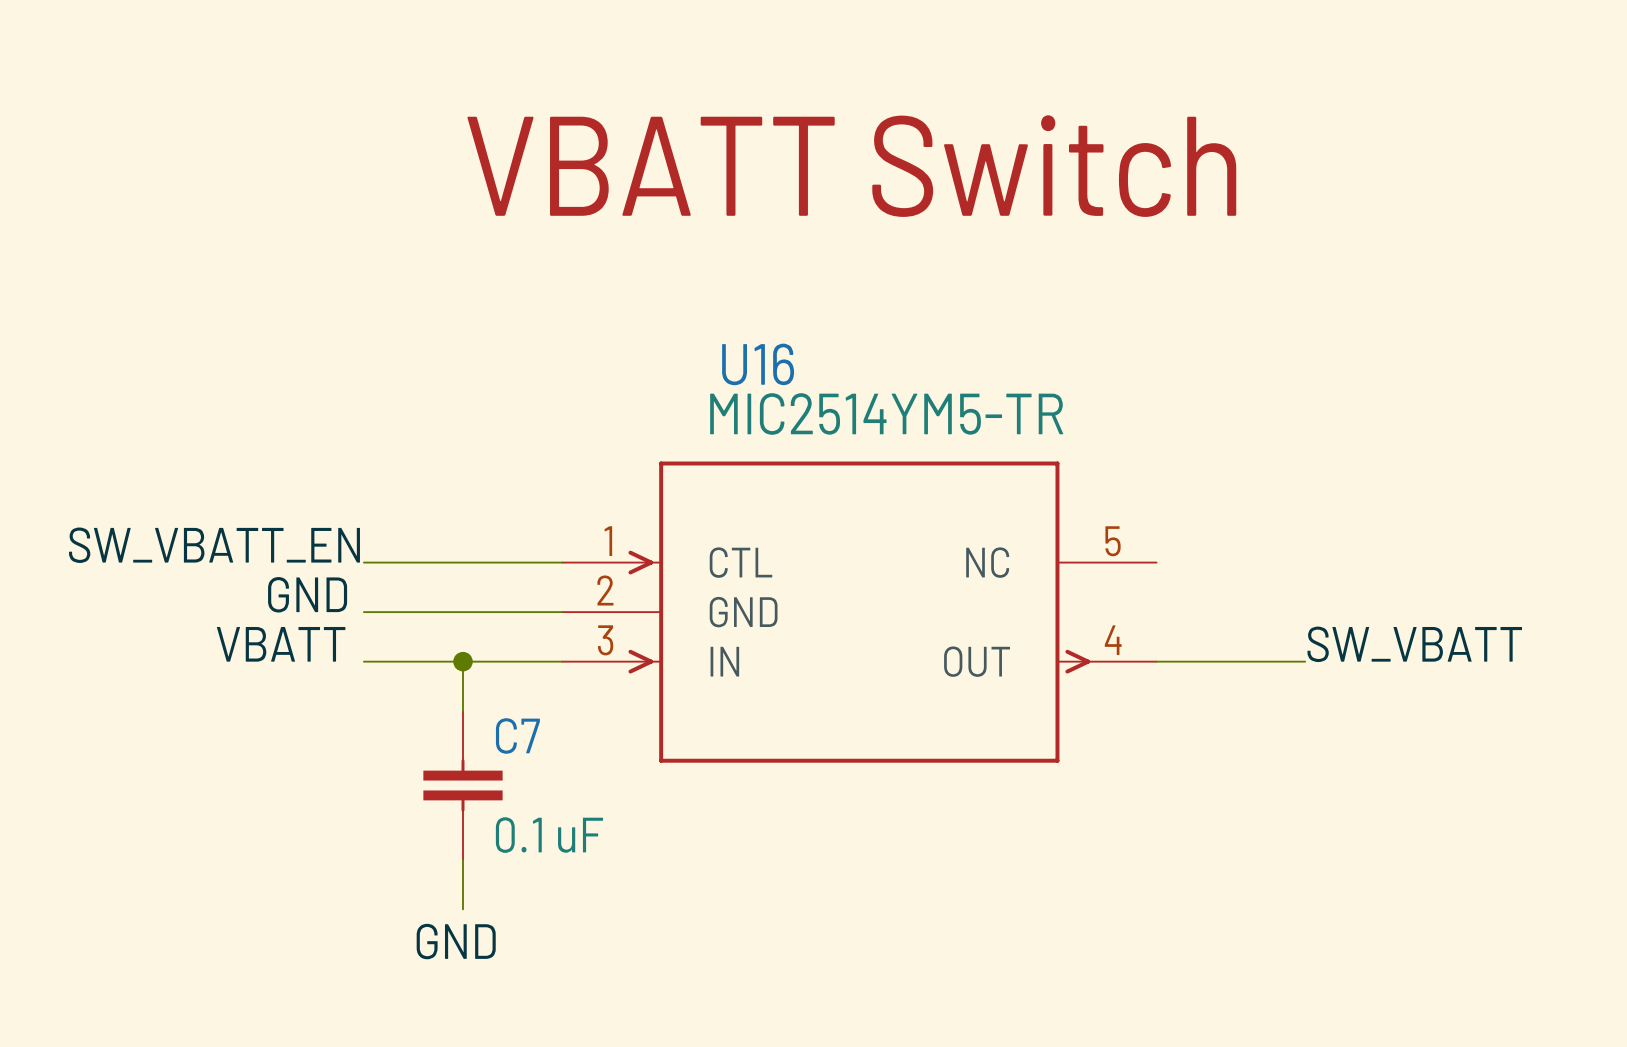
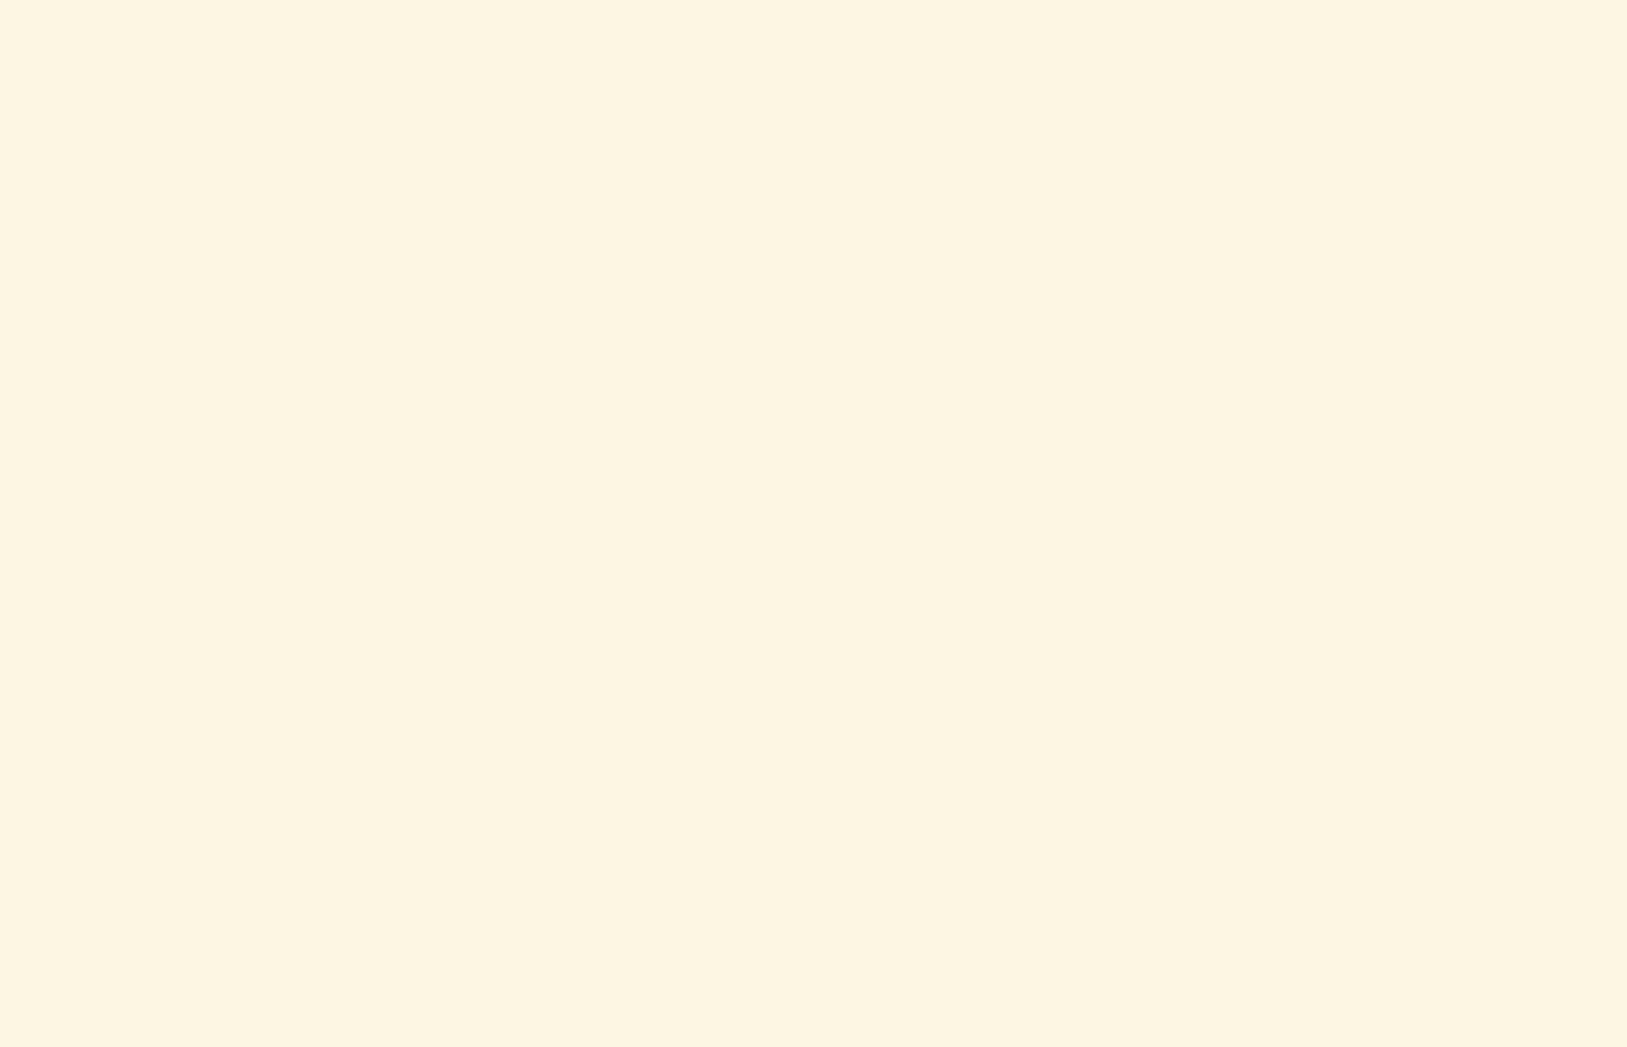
text: VBATT Switch (851, 166) -> none
label: SW_VBATT_EN (214, 545) -> none
wire: (363, 562) (562, 562) -> none
label: GND (307, 594) -> none
wire: (363, 612) (562, 612) -> none
U16: MIC2514YM5-TR (859, 612) -> none
label: VBATT (281, 644) -> none
label: SW_VBATT (1414, 644) -> none
wire: (363, 661) (562, 661) -> none
wire: (463, 661) (463, 711) -> none
junction: (463, 661) -> none
wire: (1156, 661) (1305, 661) -> none
C7: 0.1 uF (463, 785) -> none
wire: (463, 859) (463, 909) -> none
label: GND (456, 941) -> none

